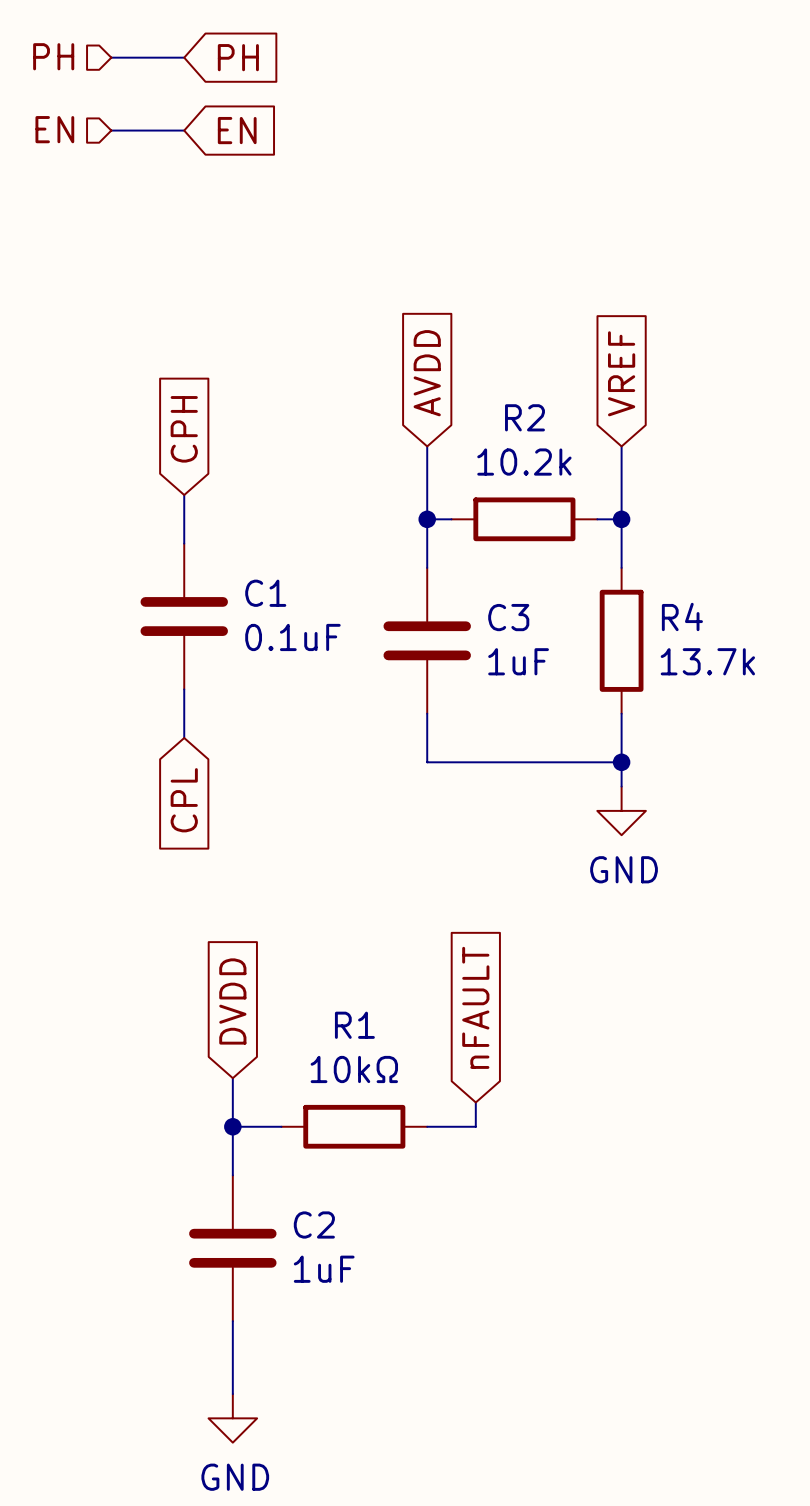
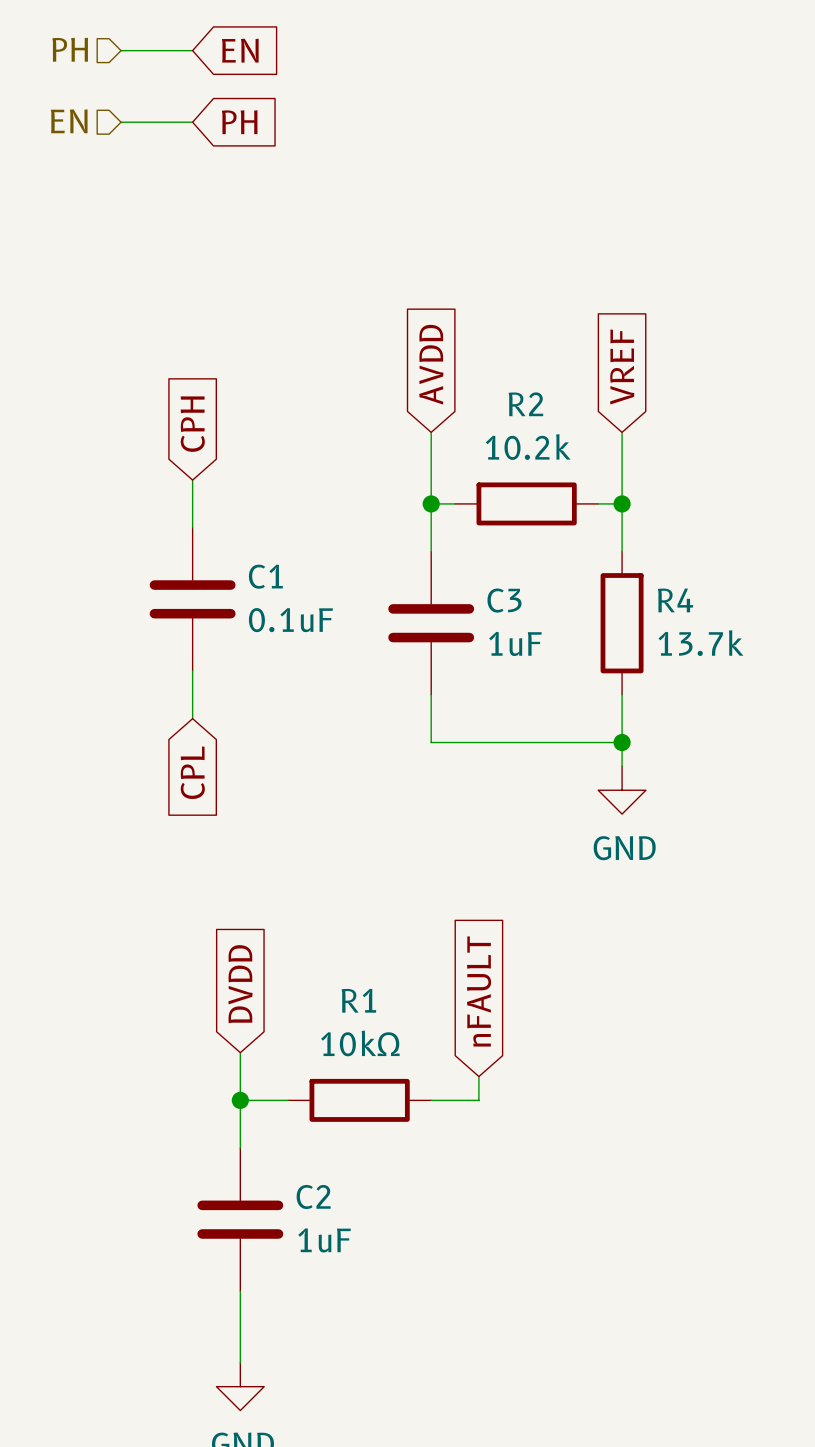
global label: PH (238, 57) -> EN (240, 50)
global label: EN (237, 130) -> PH (239, 122)

